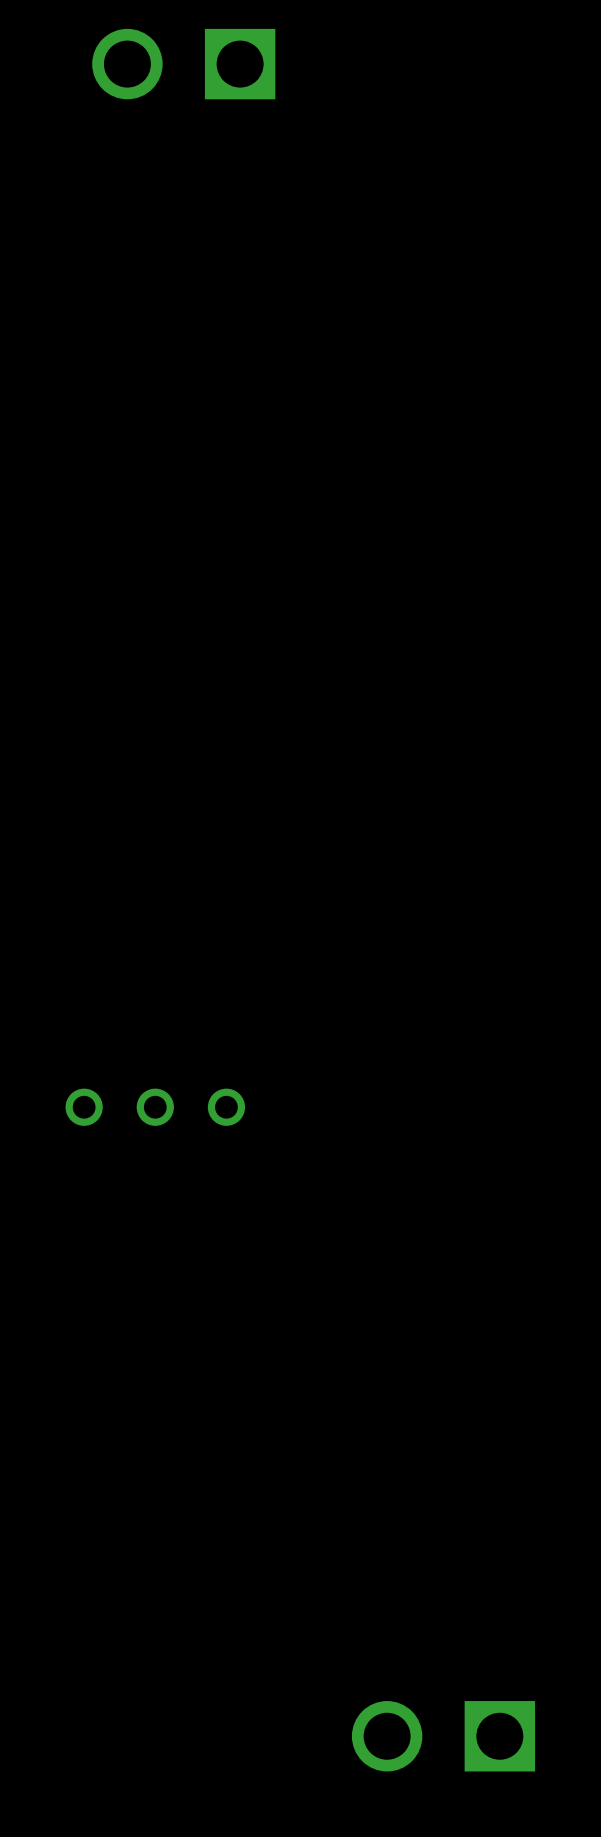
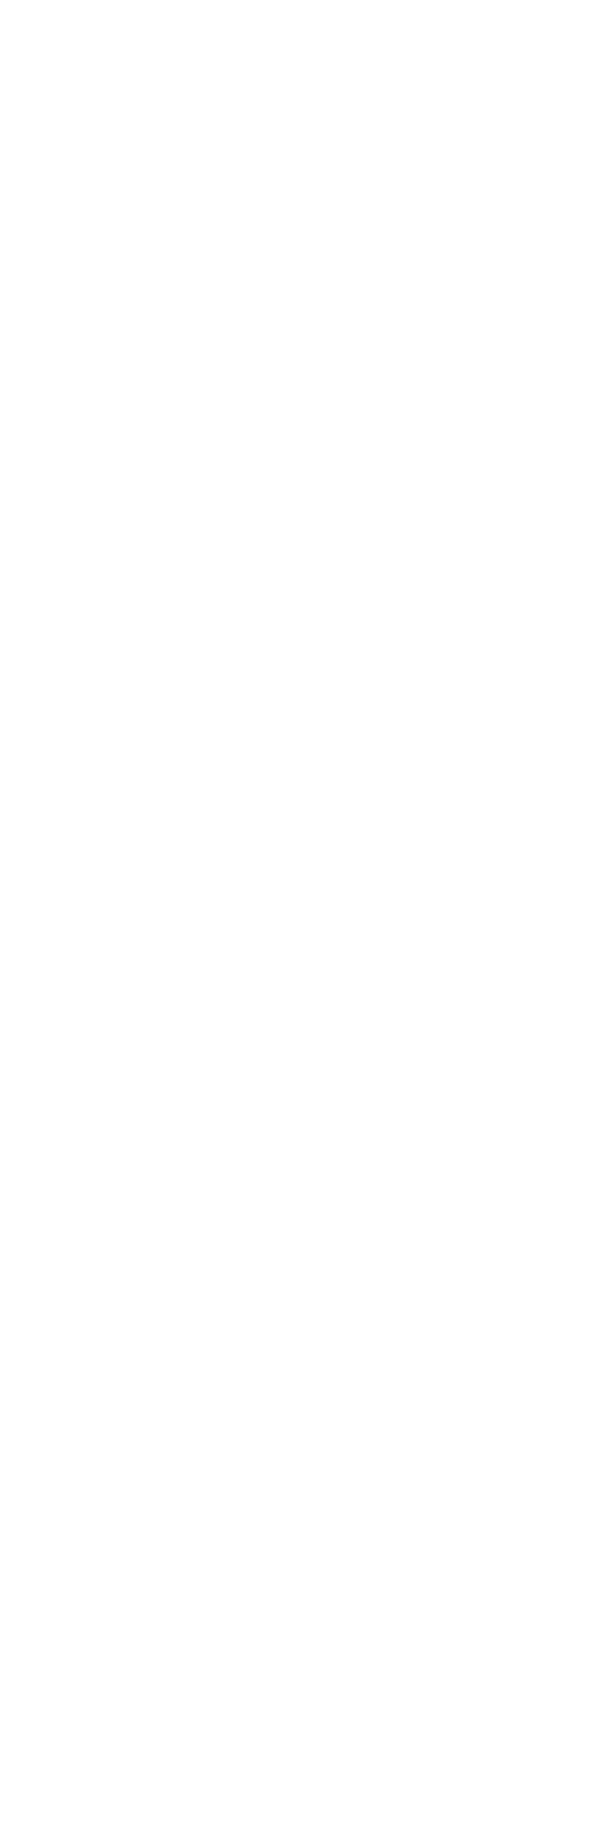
part: (183, 64) -> none
part: (155, 1107) -> none
part: (443, 1736) -> none

